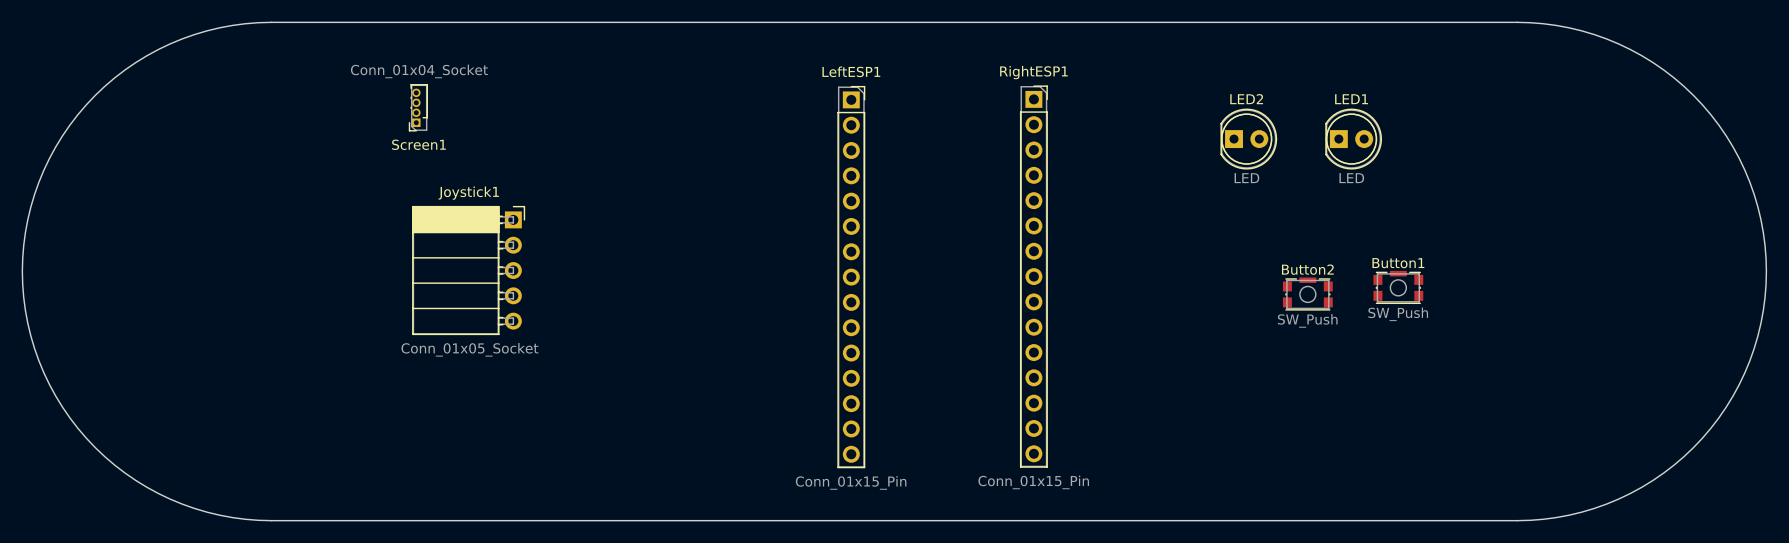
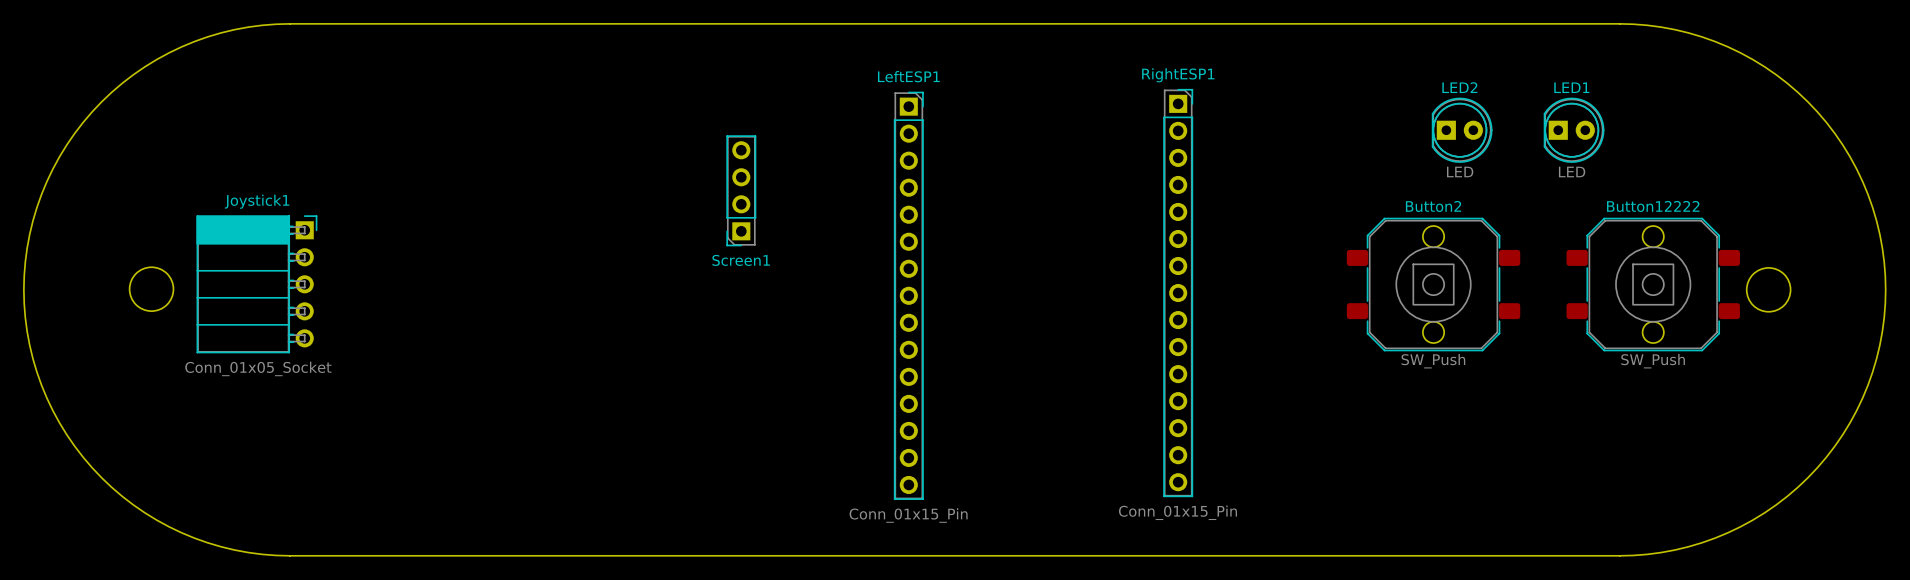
Screen1 value: Conn_01x04_Socket (419, 71) -> none
Screen1 footprint: [408, 84, 428, 132] -> [726, 135, 757, 247]
LED2 position: (1248, 139) -> (1462, 130)
LED1 position: (1353, 139) -> (1574, 130)
Screen1 name position: Screen1 (419, 144) -> Screen1 (741, 260)
round board edge: none -> [129, 266, 174, 312]
round board edge: none -> [1746, 267, 1791, 313]
Button12222: none -> SW_Push (1653, 284)
Button2 name position: Button2 (1307, 269) -> Button2 (1433, 206)
Joystick1 position: (468, 270) -> (256, 284)
RightESP1 position: (1033, 276) -> (1178, 293)
Button2 footprint: [1282, 277, 1333, 311] -> [1346, 217, 1521, 352]
Button1: SW_Push (1398, 287) -> none
Button2 value position: SW_Push (1307, 320) -> SW_Push (1433, 361)

